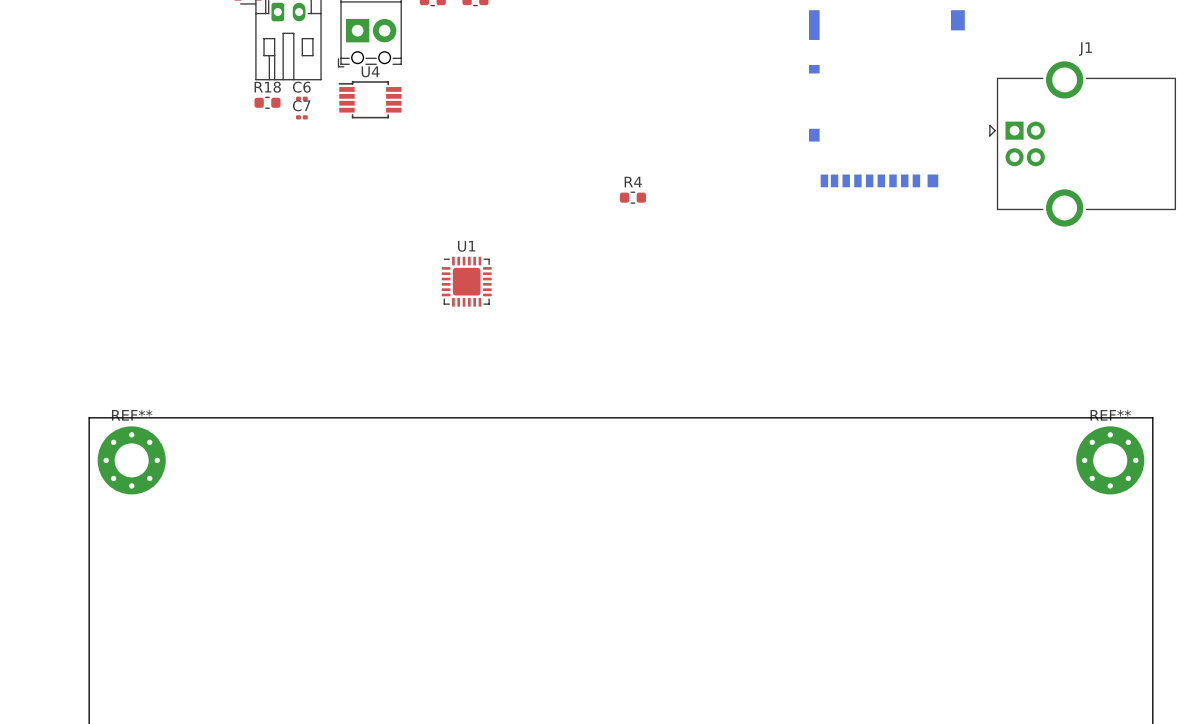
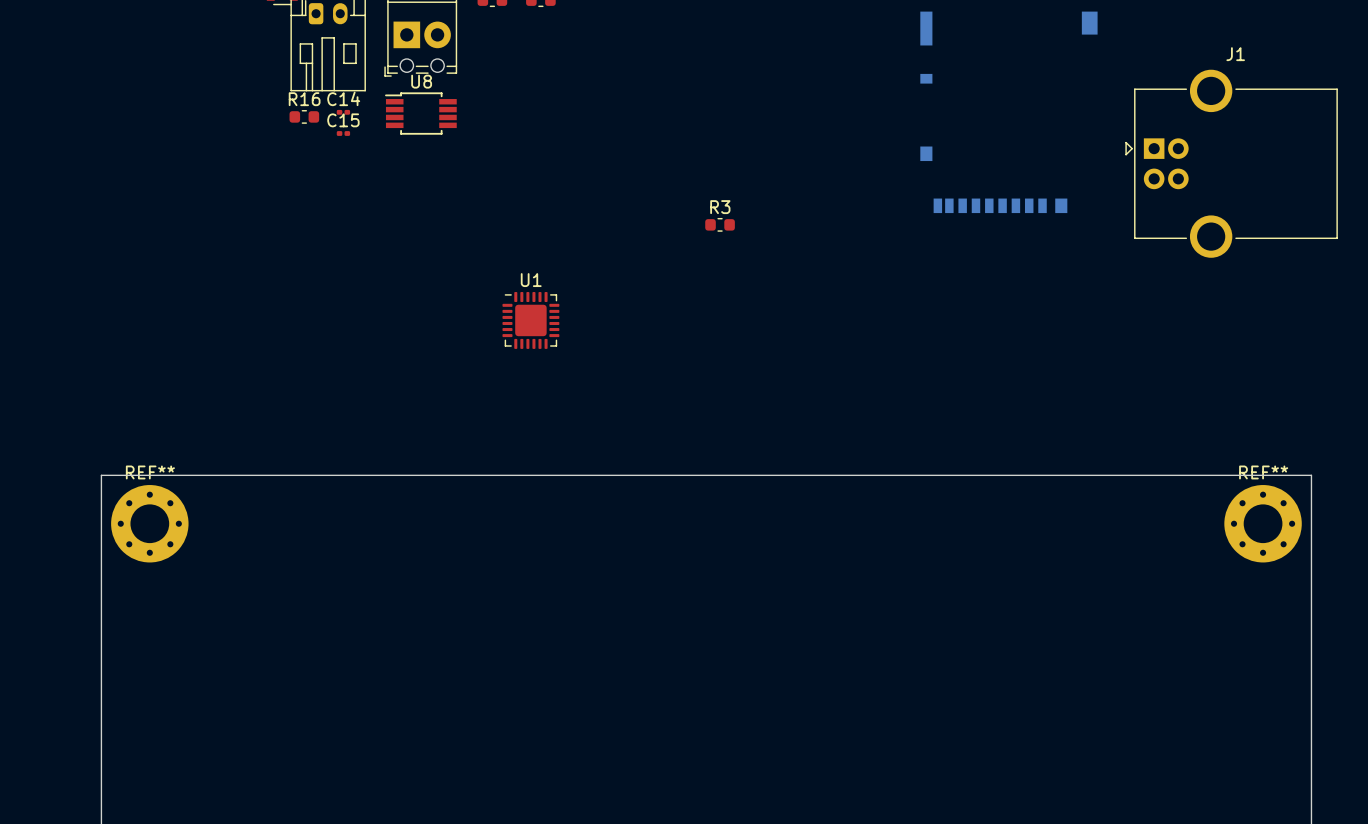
U4 name: U4 (370, 71) -> U8 (421, 81)
R18 name: R18 (267, 87) -> R16 (304, 99)
C6 name: C6 (301, 87) -> C14 (343, 98)
C7 name: C7 (301, 105) -> C15 (343, 120)
R4 name: R4 (633, 182) -> R3 (720, 207)

